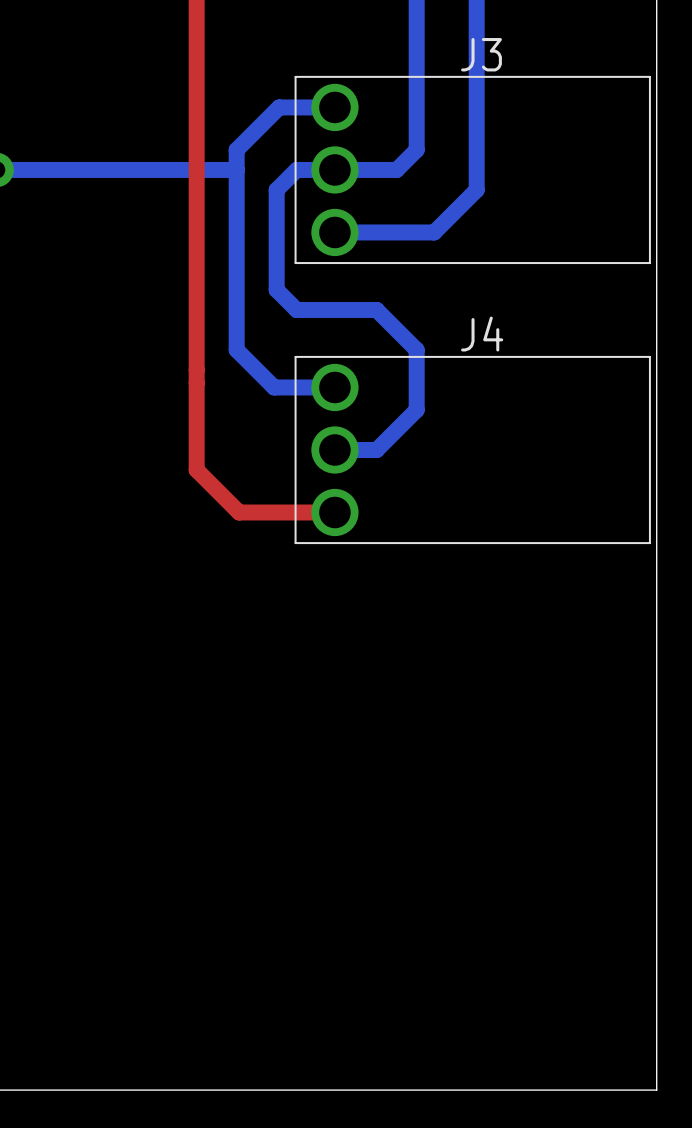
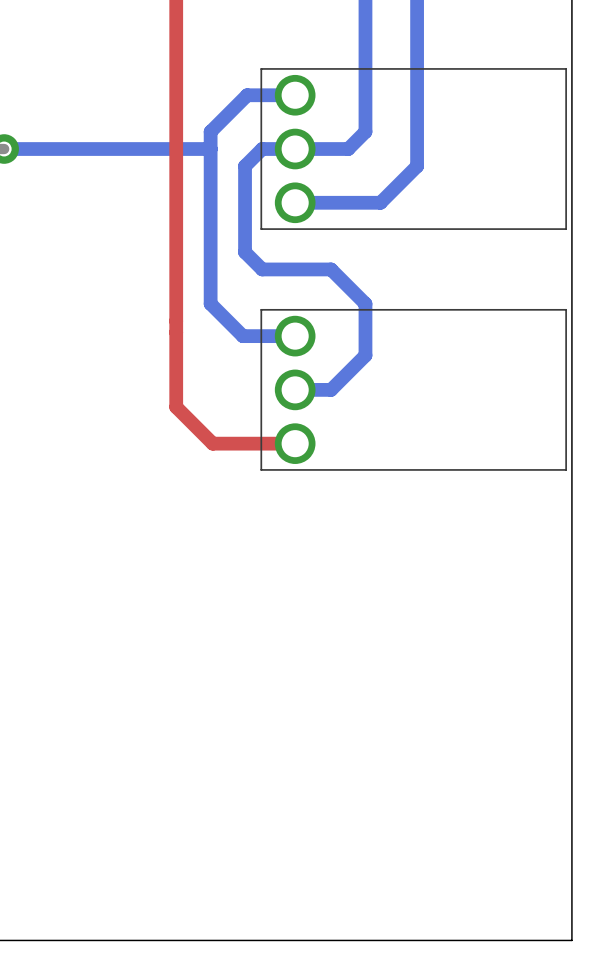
J3 name: J3 (481, 54) -> none
J4 name: J4 (482, 334) -> none

